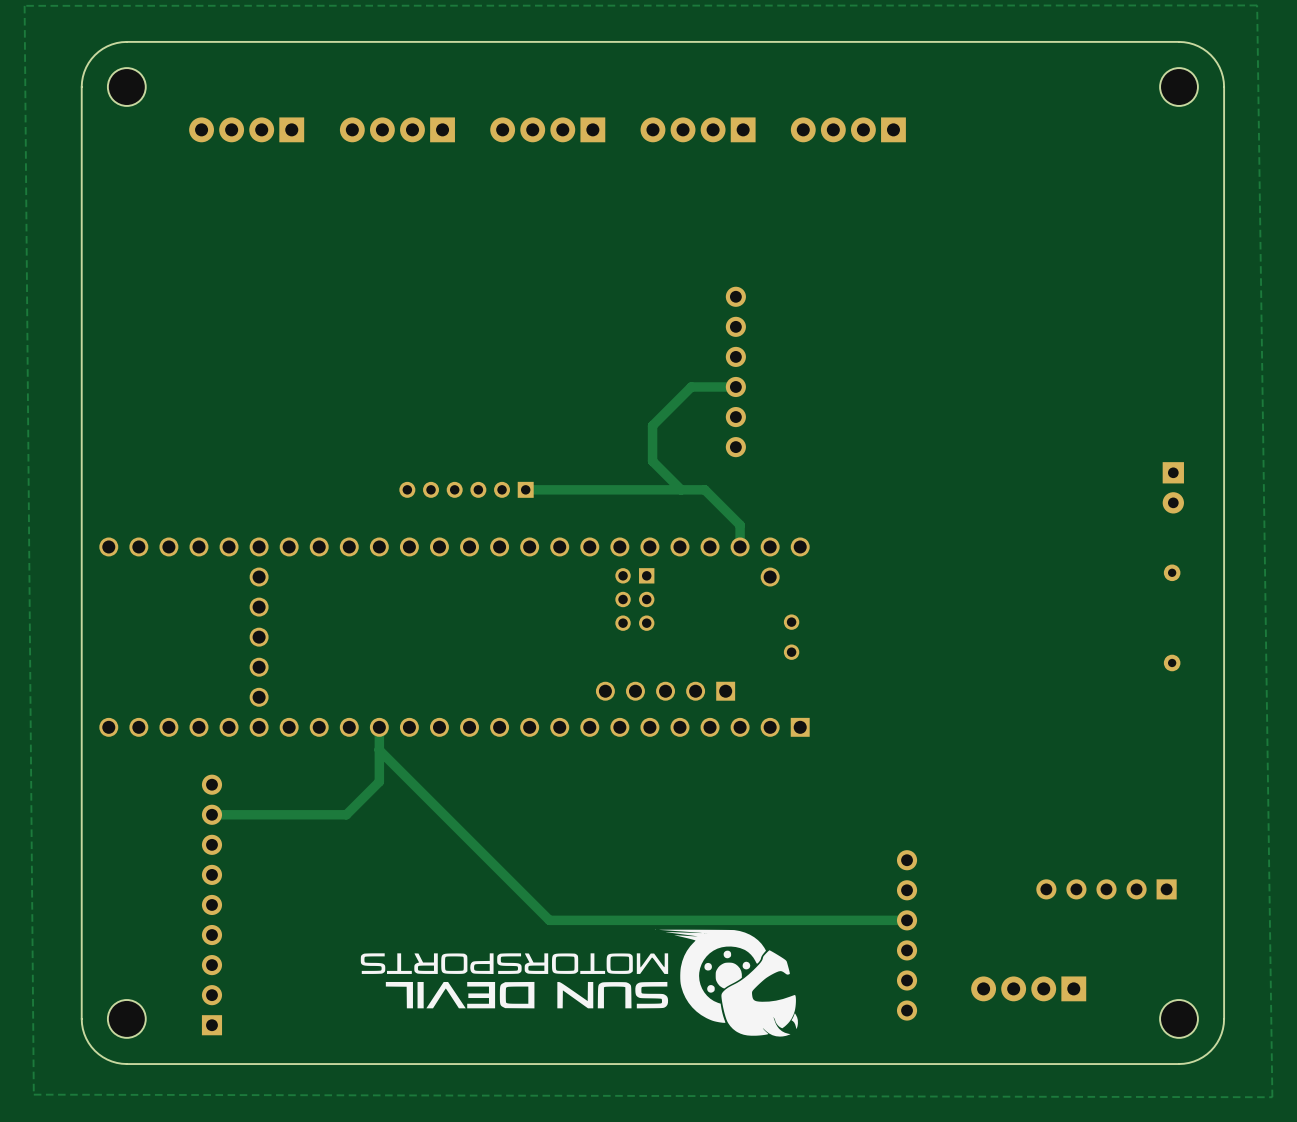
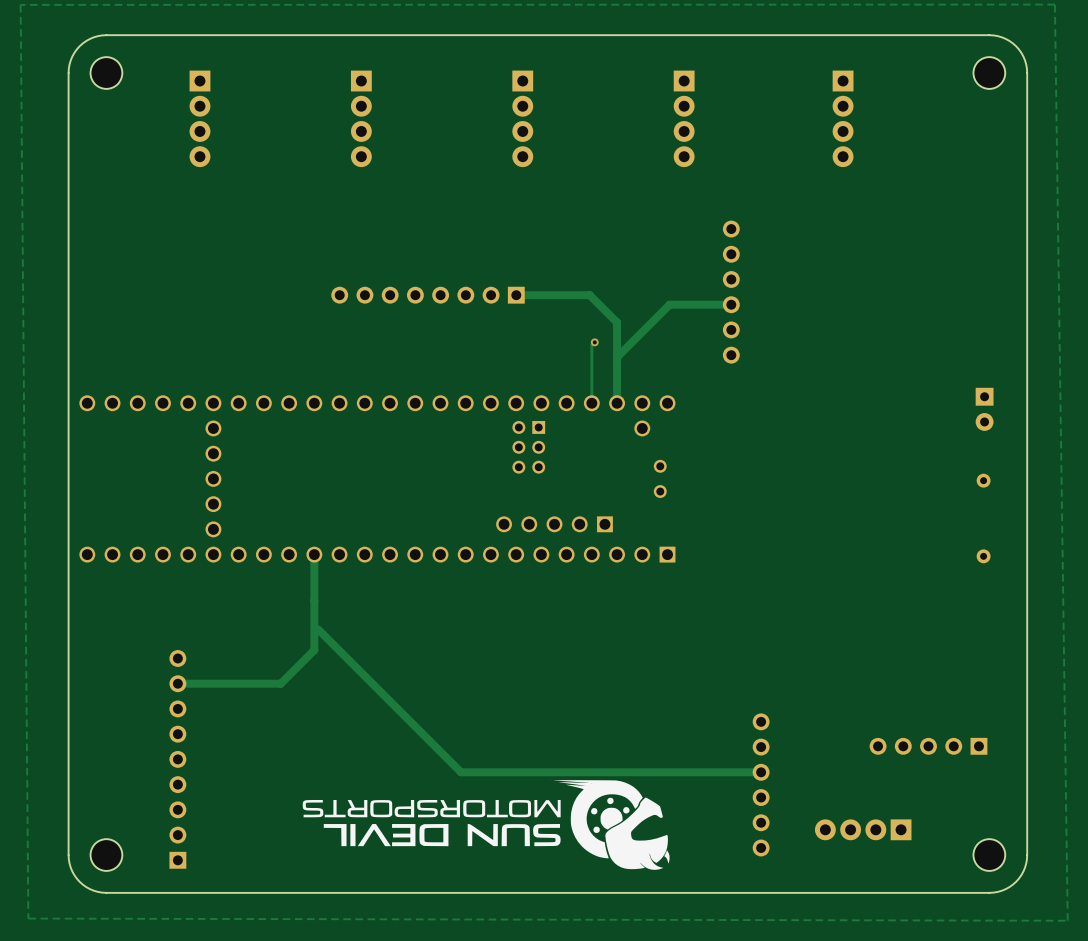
part rotation: 0° (246, 129) -> 90° counterclockwise (199, 118)
part rotation: 0° (397, 129) -> 90° counterclockwise (361, 118)
part: (547, 129) -> none
part: (698, 129) -> none
part rotation: 0° (848, 129) -> 90° counterclockwise (684, 118)
part: none -> (522, 118)
part: none -> (843, 118)
part: none -> (428, 295)
track: none -> (516, 295) (589, 295) (617, 322) (617, 403)
track: none -> (731, 304) (669, 304) (617, 357)
part position: (735, 371) -> (731, 292)
track: (735, 386) (691, 386) (652, 425) (652, 461) (681, 489) -> none
track: none -> (594, 342) (591, 345) (591, 403)
via: none -> (594, 342)
part: (466, 489) -> none
track: (525, 489) (704, 489) (740, 525) (740, 546) -> none
part position: (454, 637) -> (377, 478)
track: (379, 727) (379, 781) (346, 814) (334, 814) -> (314, 554) (314, 650) (280, 683)

